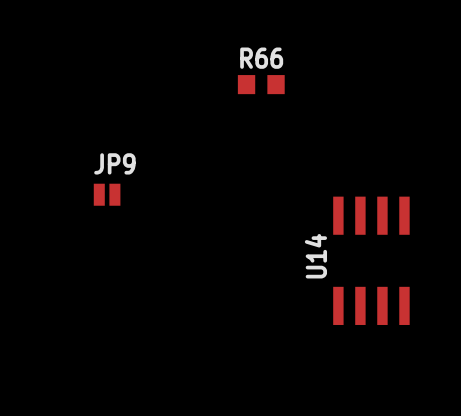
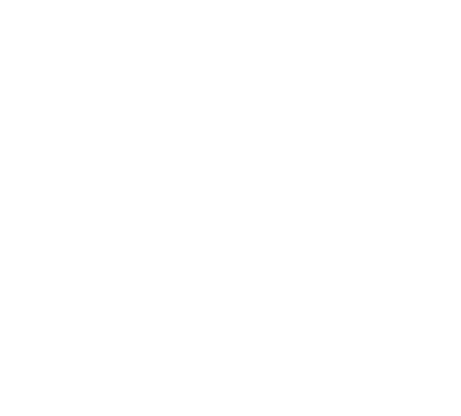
R66: (261, 84) -> none
JP9: (107, 194) -> none
U14: (371, 260) -> none

